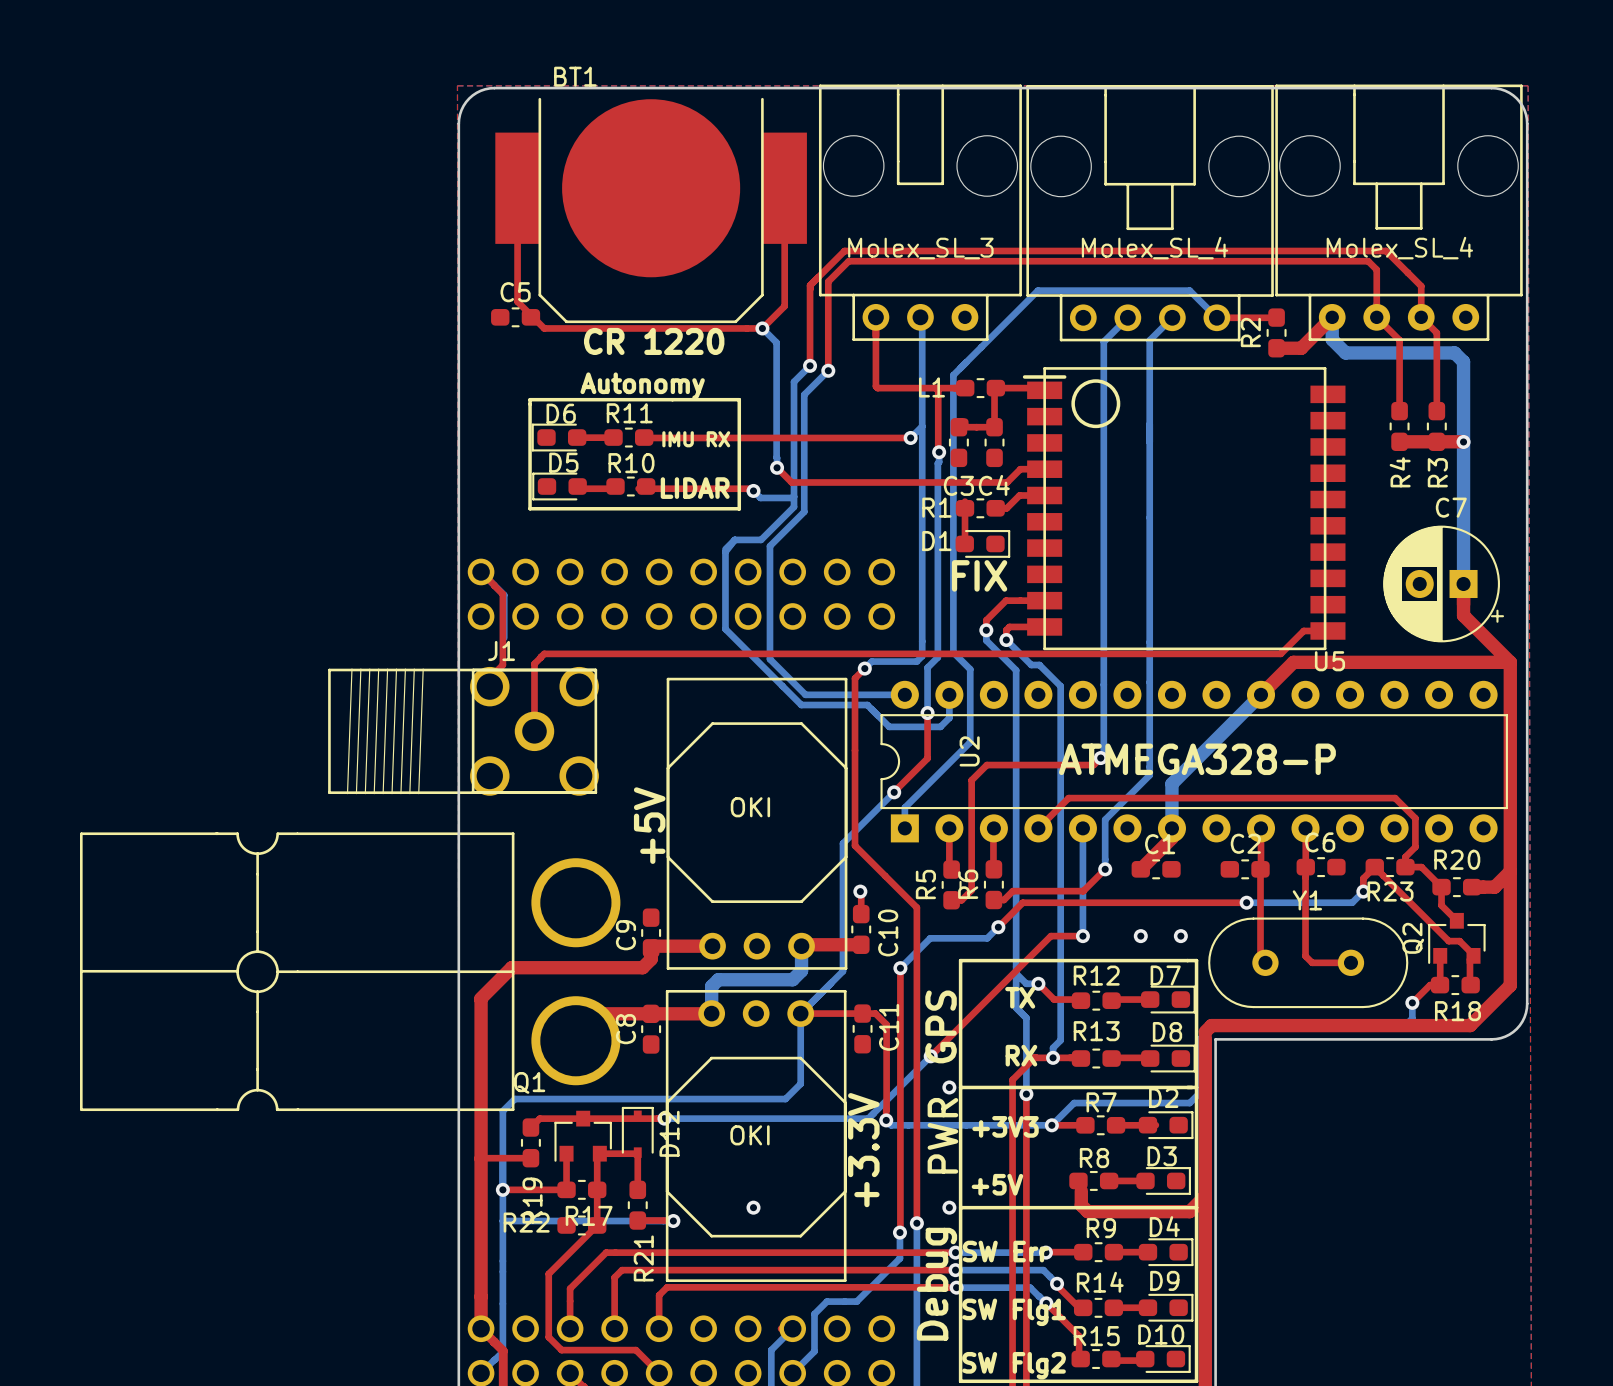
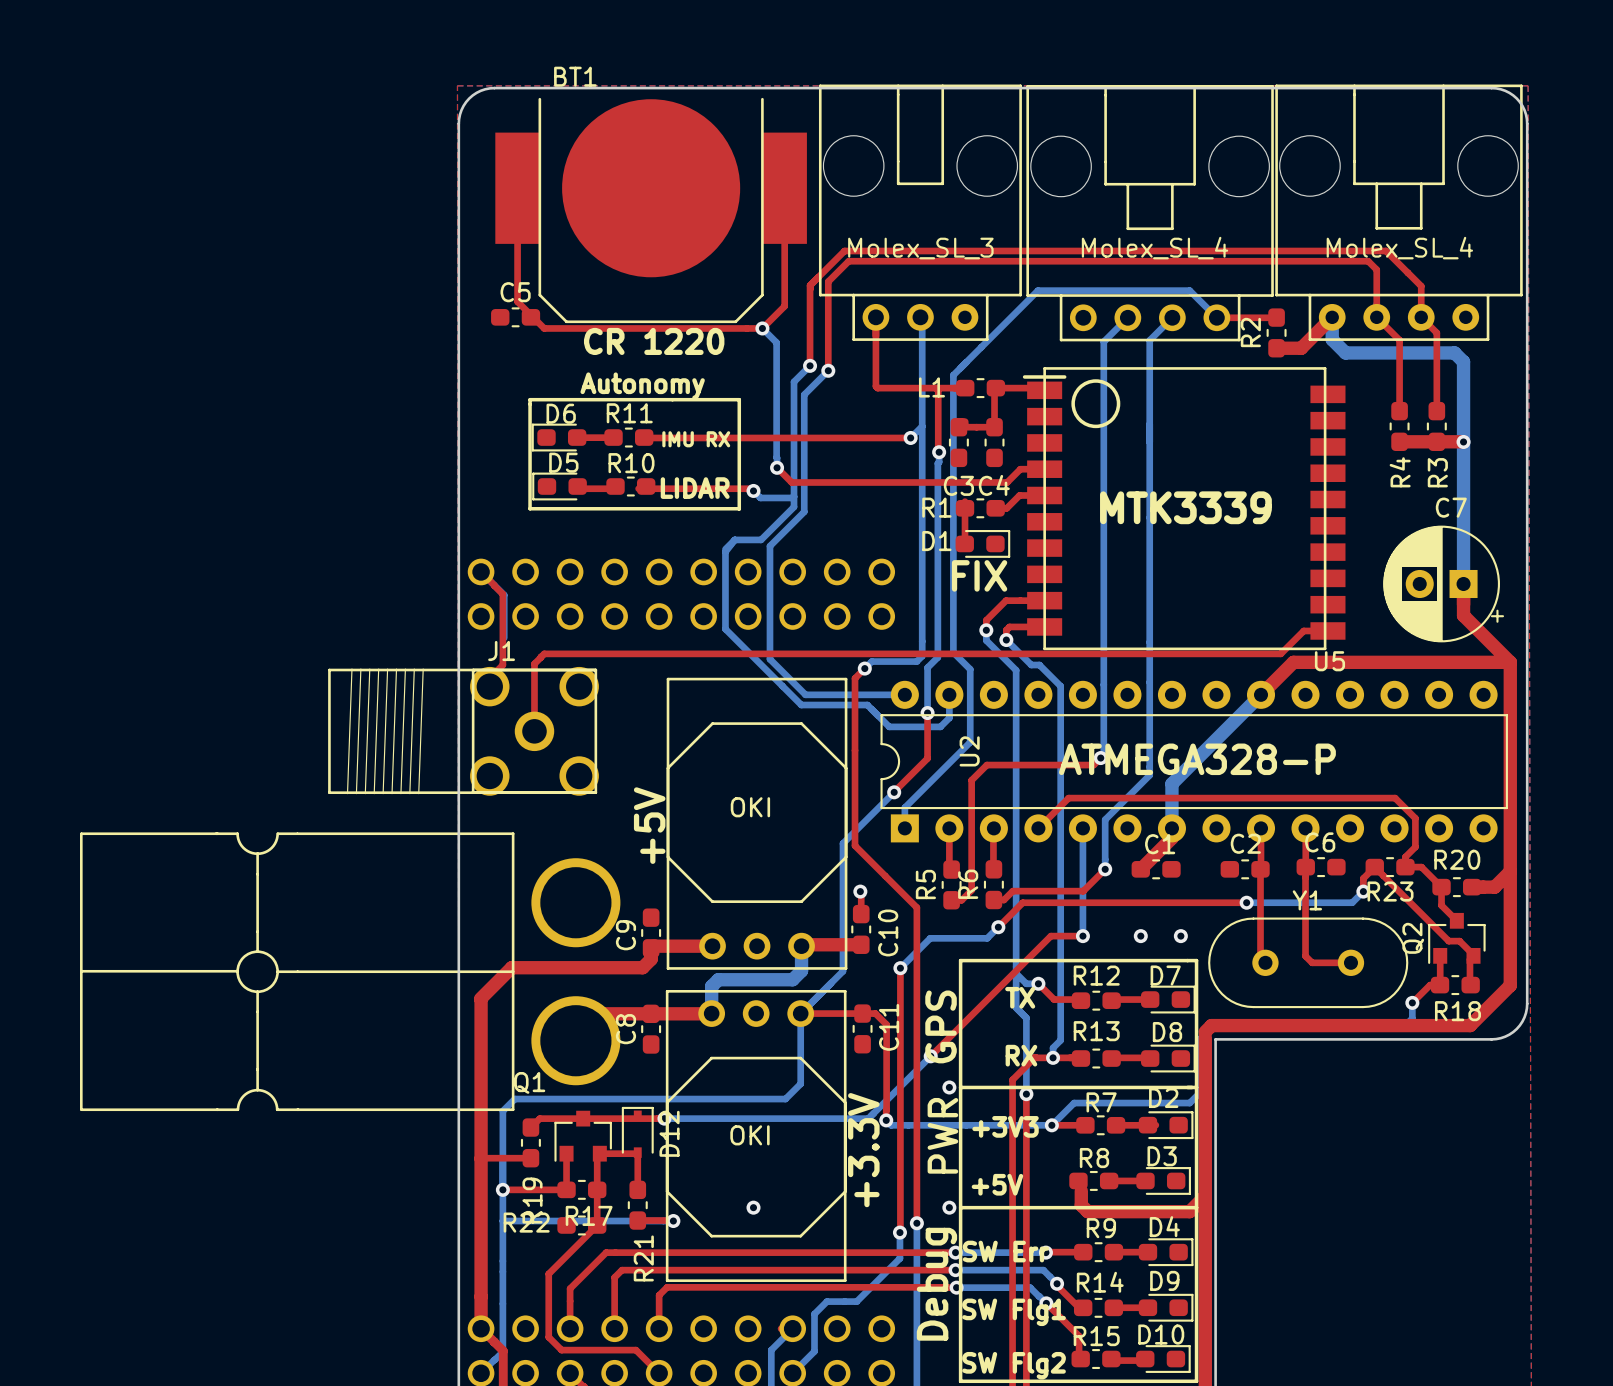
text: none -> MTK3339 (1185, 507)

